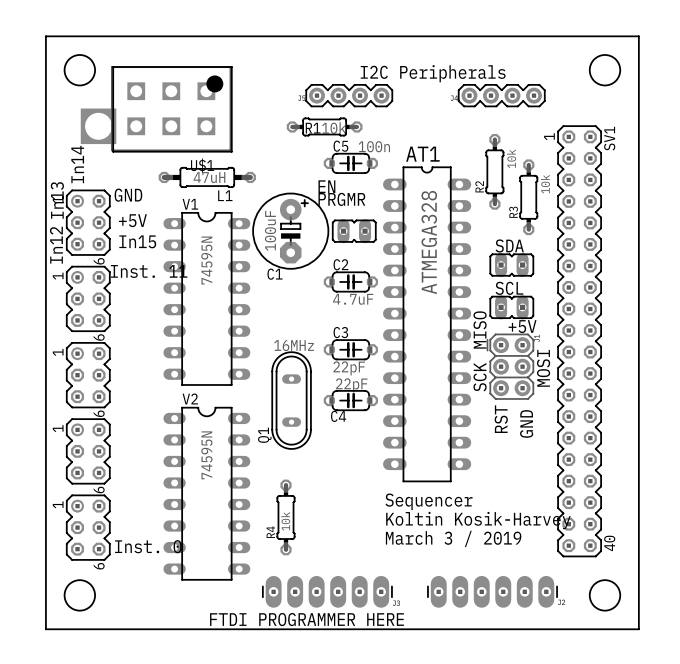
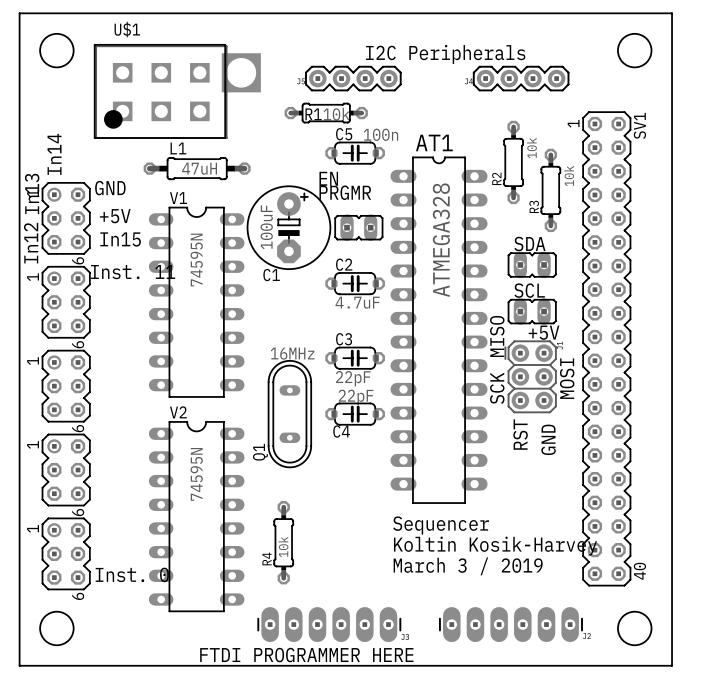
U$1 rotation: 0° (156, 109) -> 180° (177, 91)
L1 name position: L1 (225, 195) -> L1 (178, 148)

